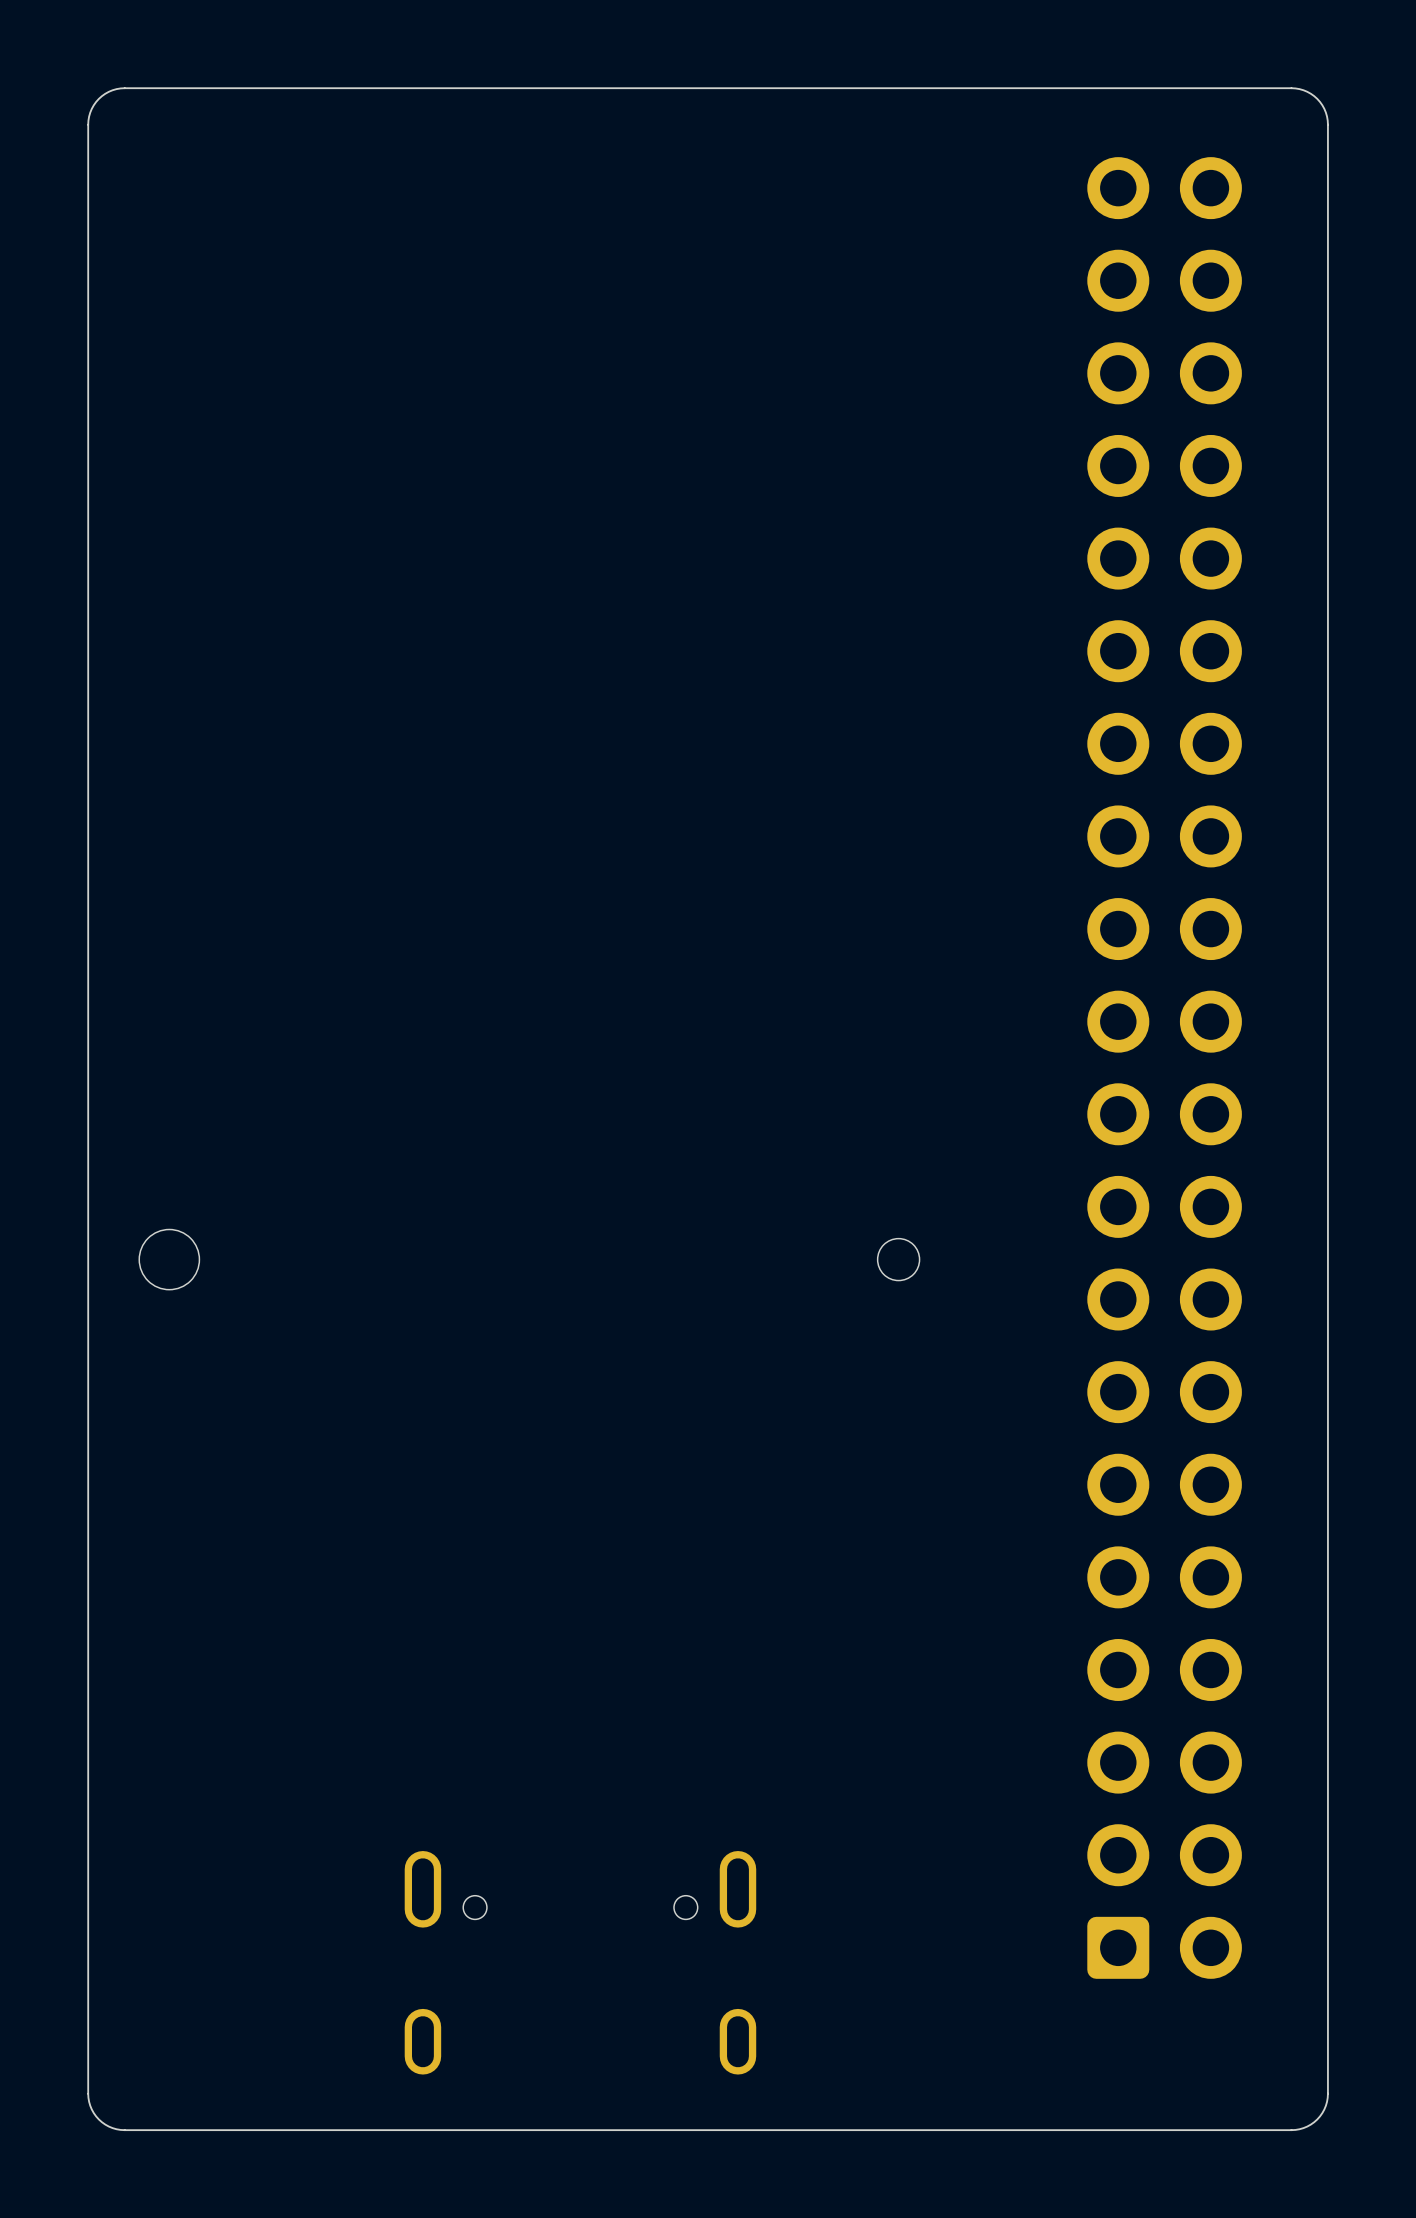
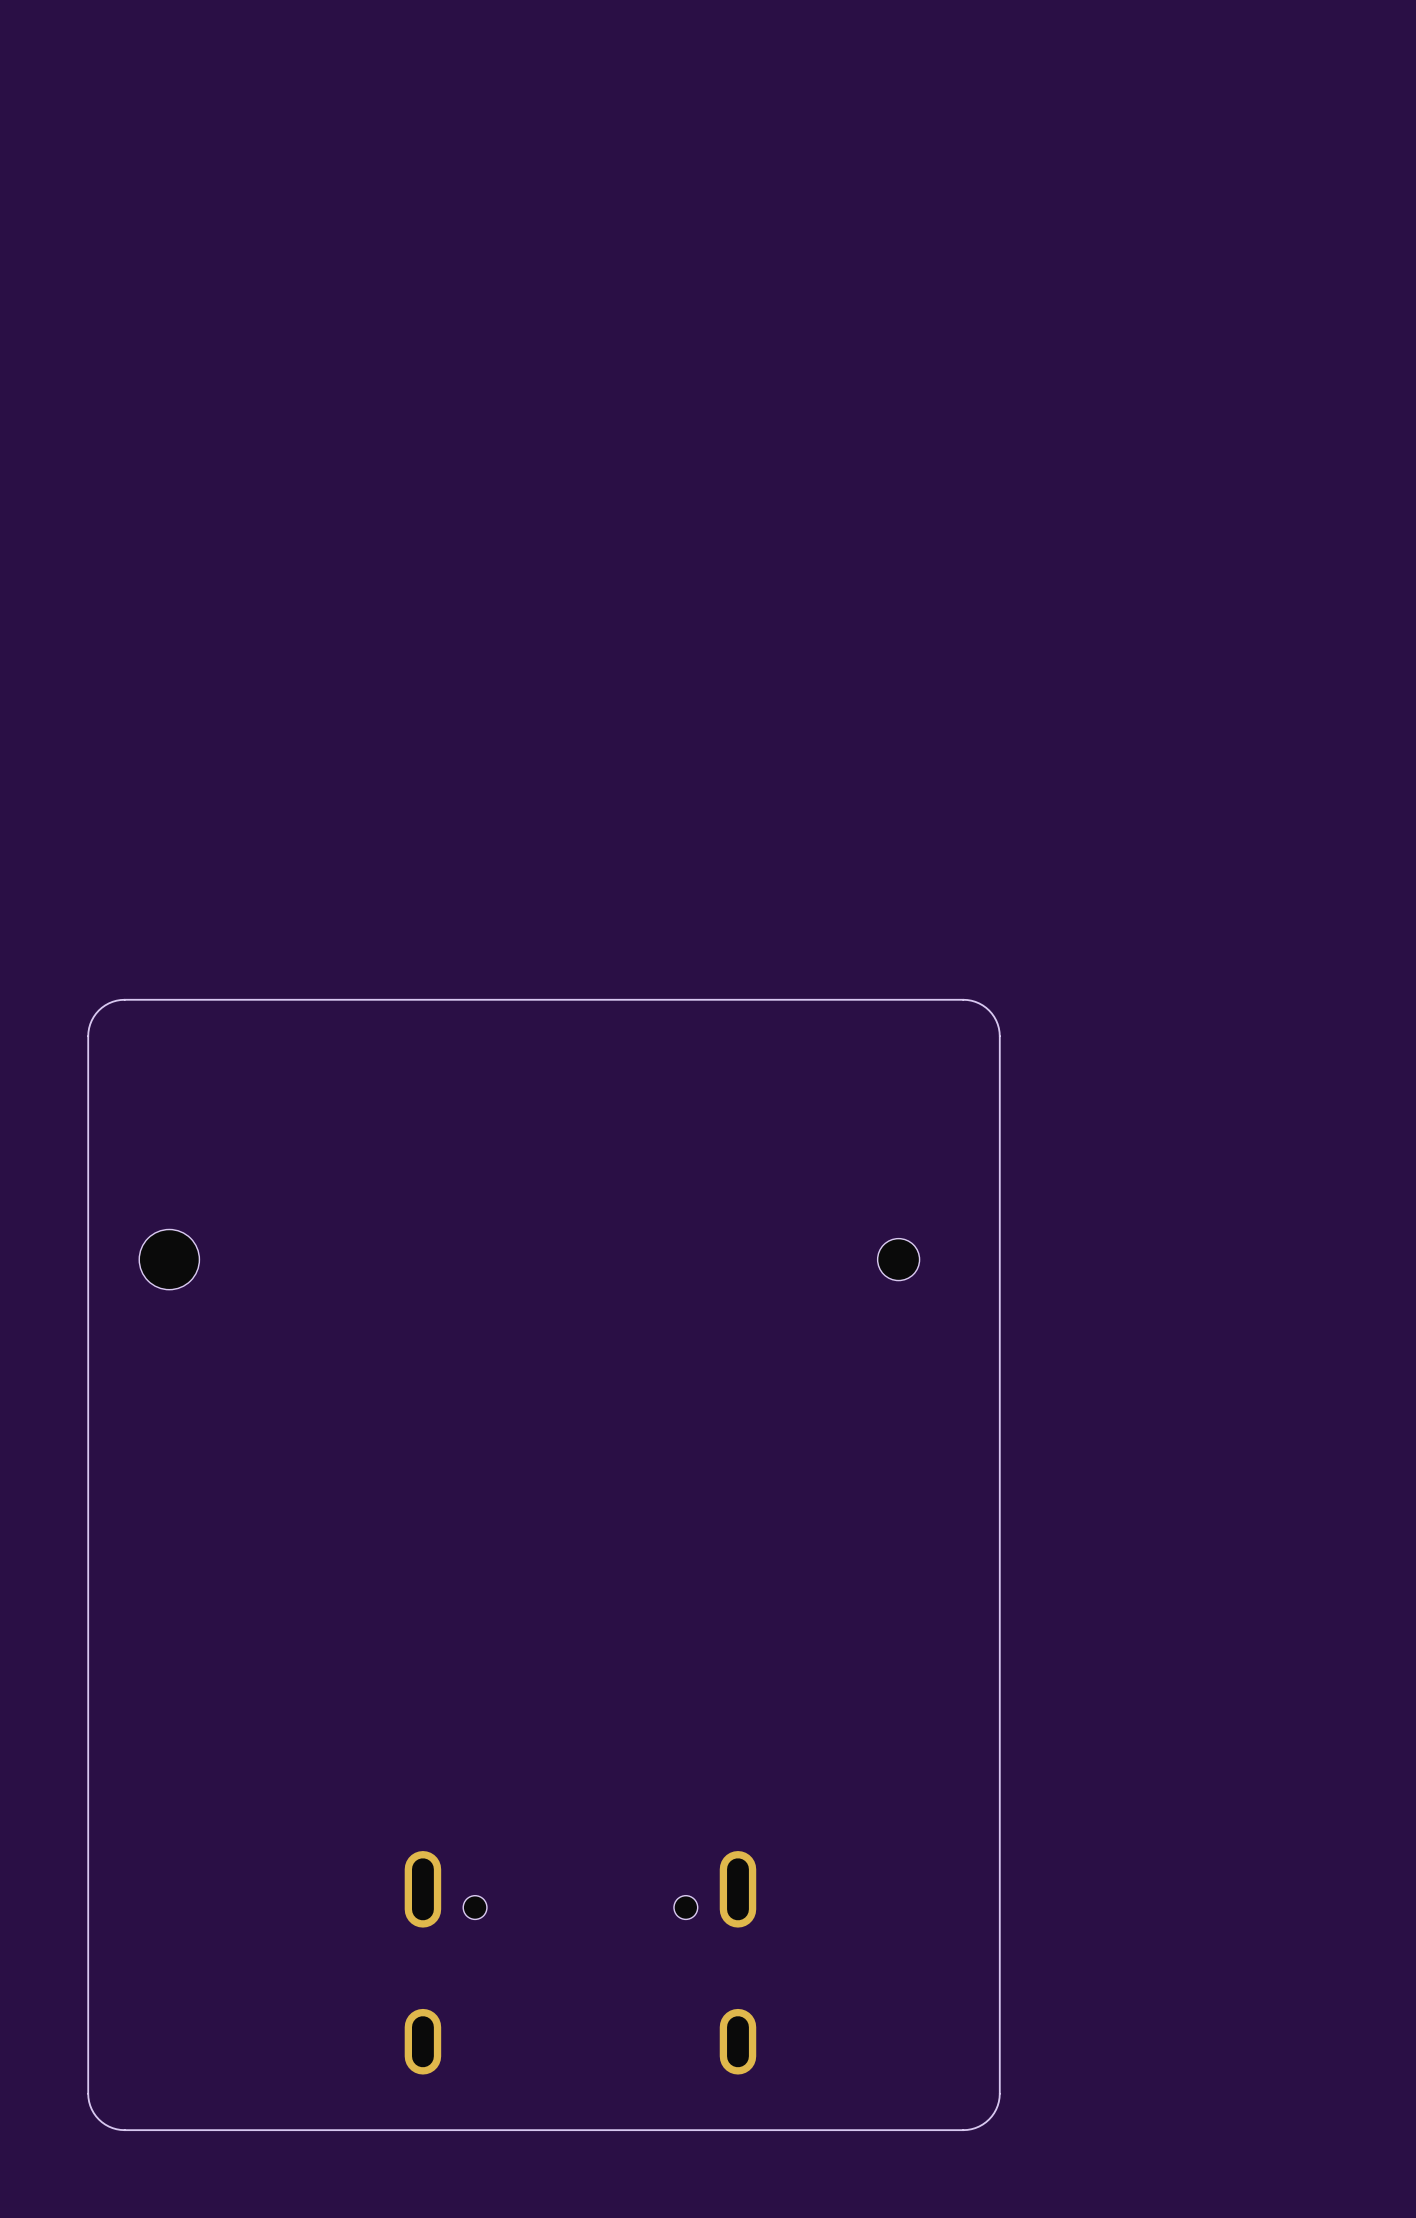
board edge: (88, 1036) (88, 124) (91, 108) (101, 96) (112, 90) (124, 88) (1291, 88) (1307, 91) (1320, 101) (1325, 112) (1327, 124) (1327, 2101) (1322, 2113) (1314, 2122) (1295, 2129) (963, 2130) -> (88, 1036) (90, 1024) (98, 1010) (108, 1003) (124, 999) (963, 999) (979, 1003) (991, 1013) (997, 1024) (999, 1036) (999, 2093) (997, 2105) (989, 2119) (979, 2126) (963, 2130)
part: (1164, 1067) -> none

